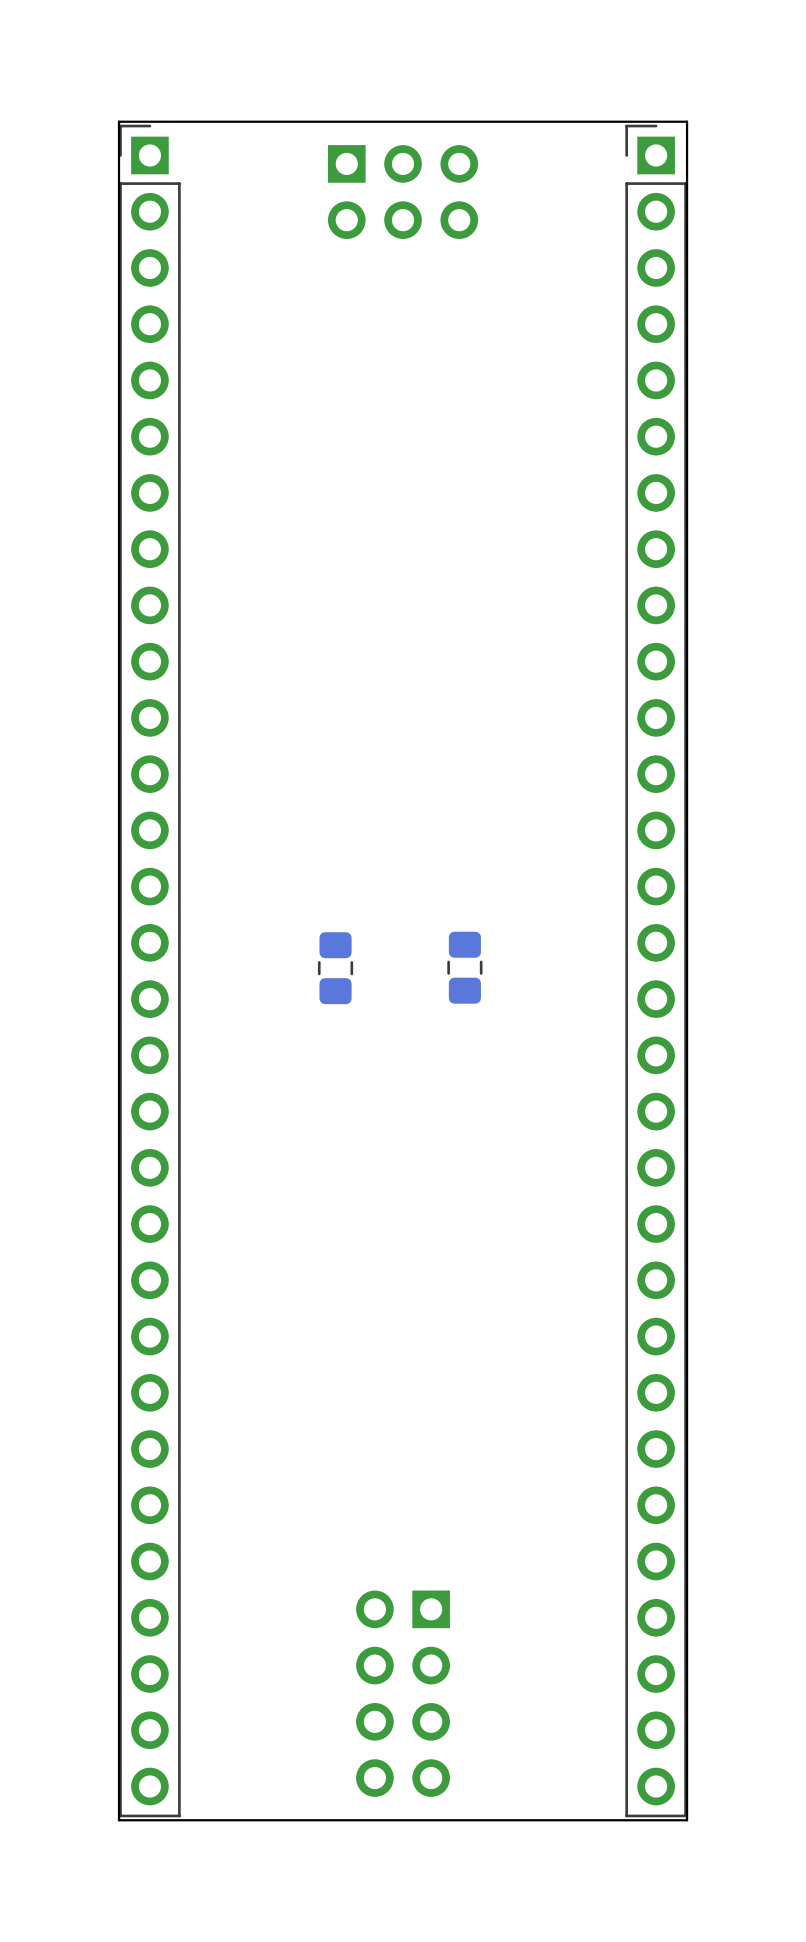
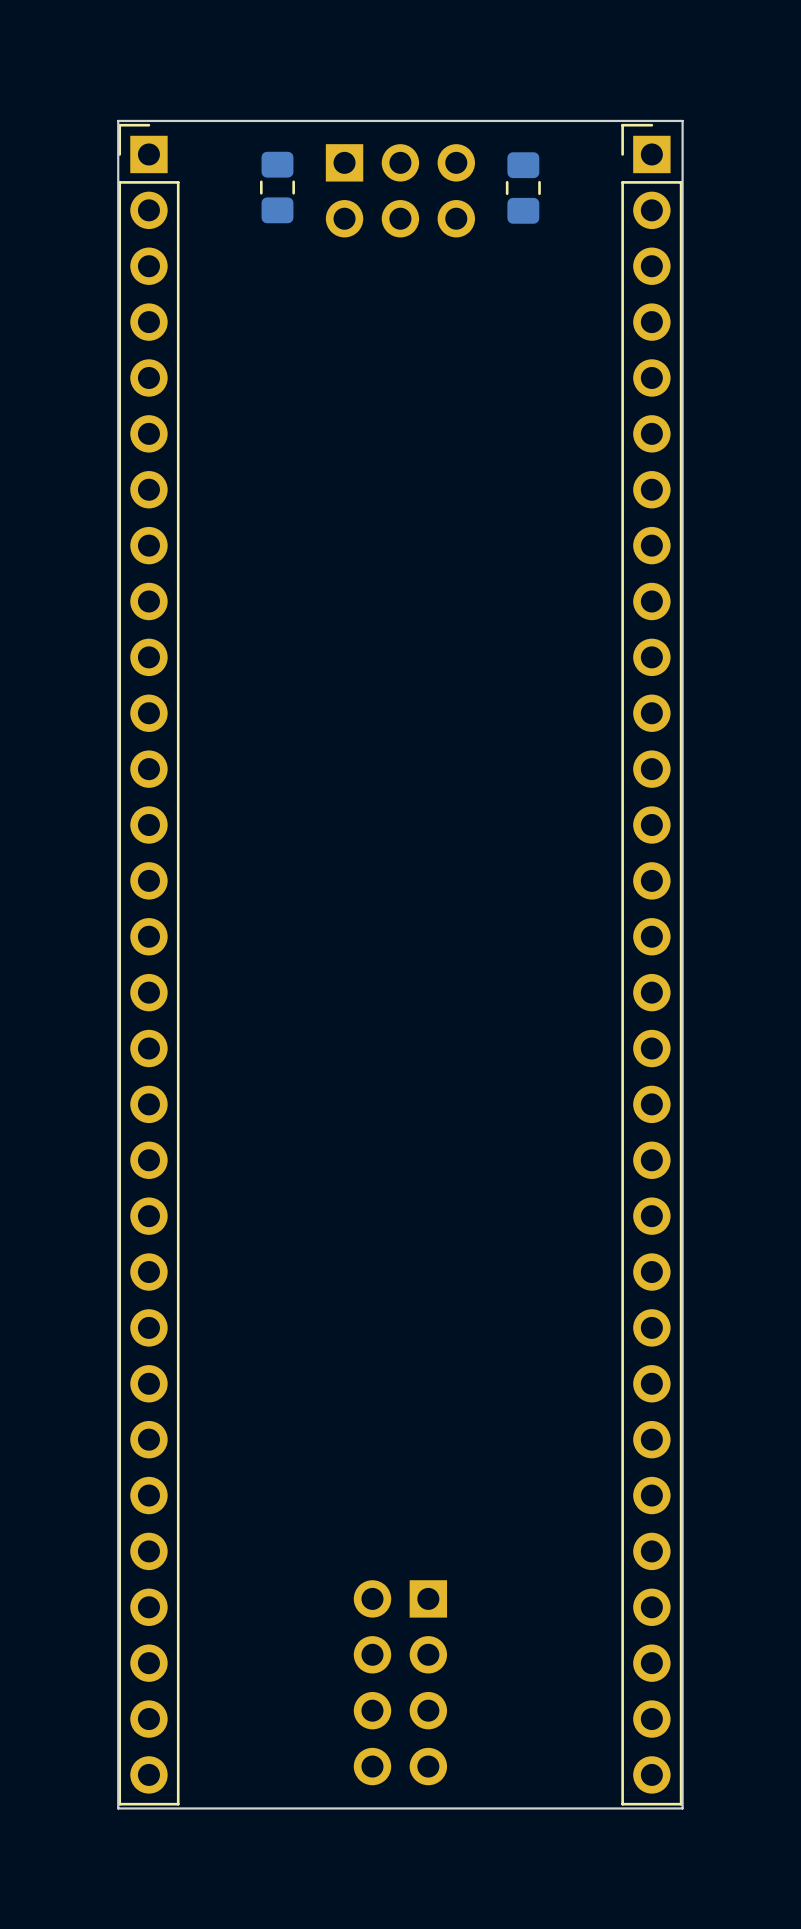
part: none -> (277, 187)
part: none -> (523, 188)
part: (464, 967) -> none
part: (335, 968) -> none

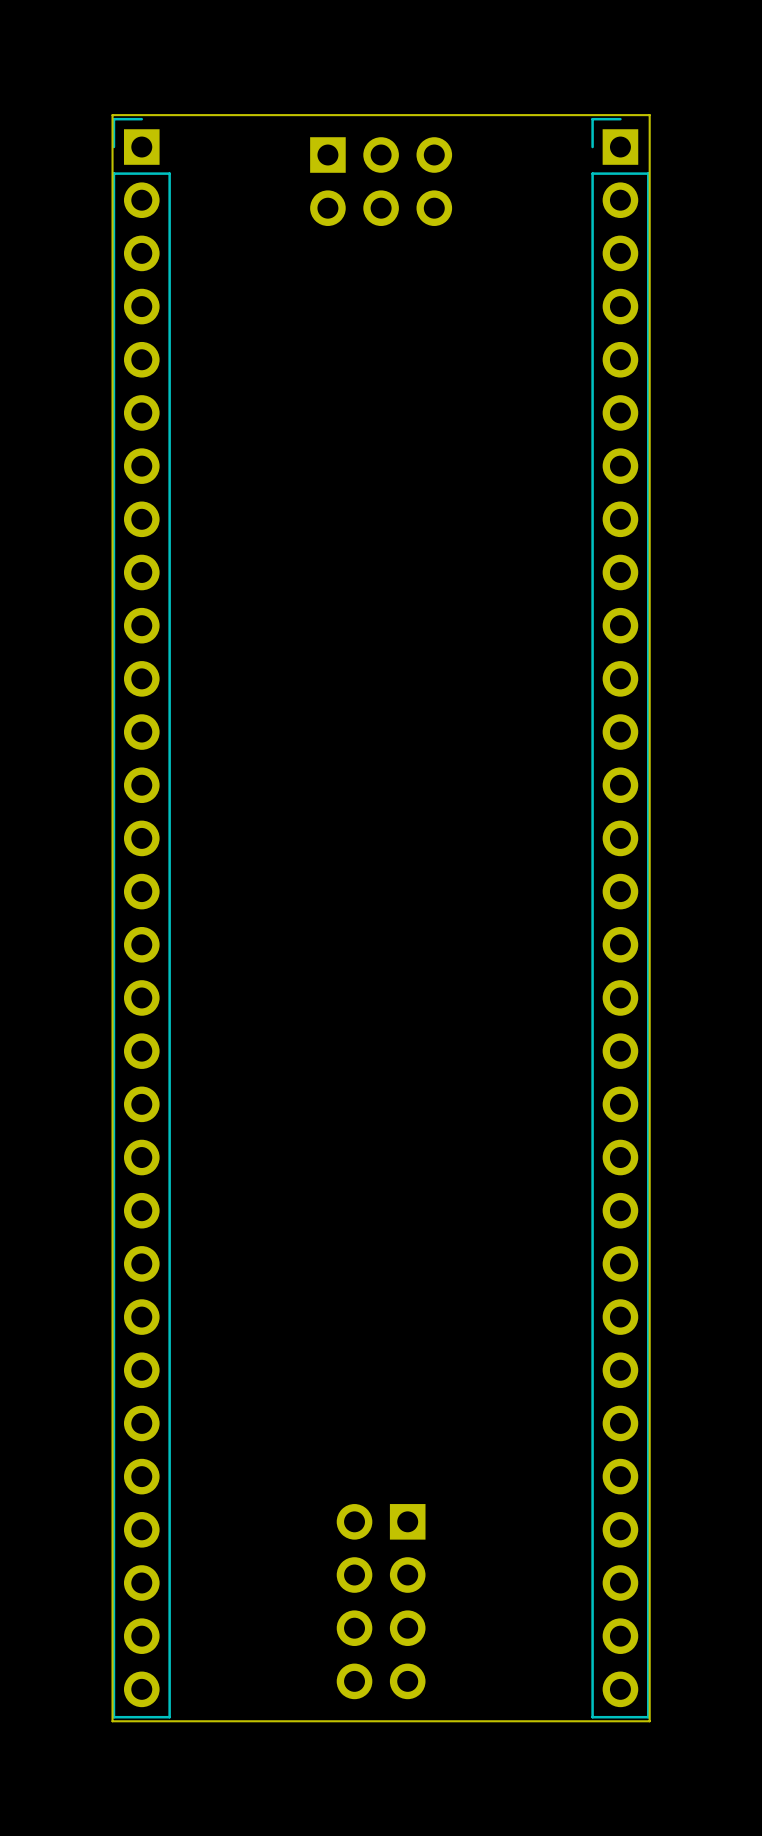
part: (277, 187) -> none
part: (523, 188) -> none

